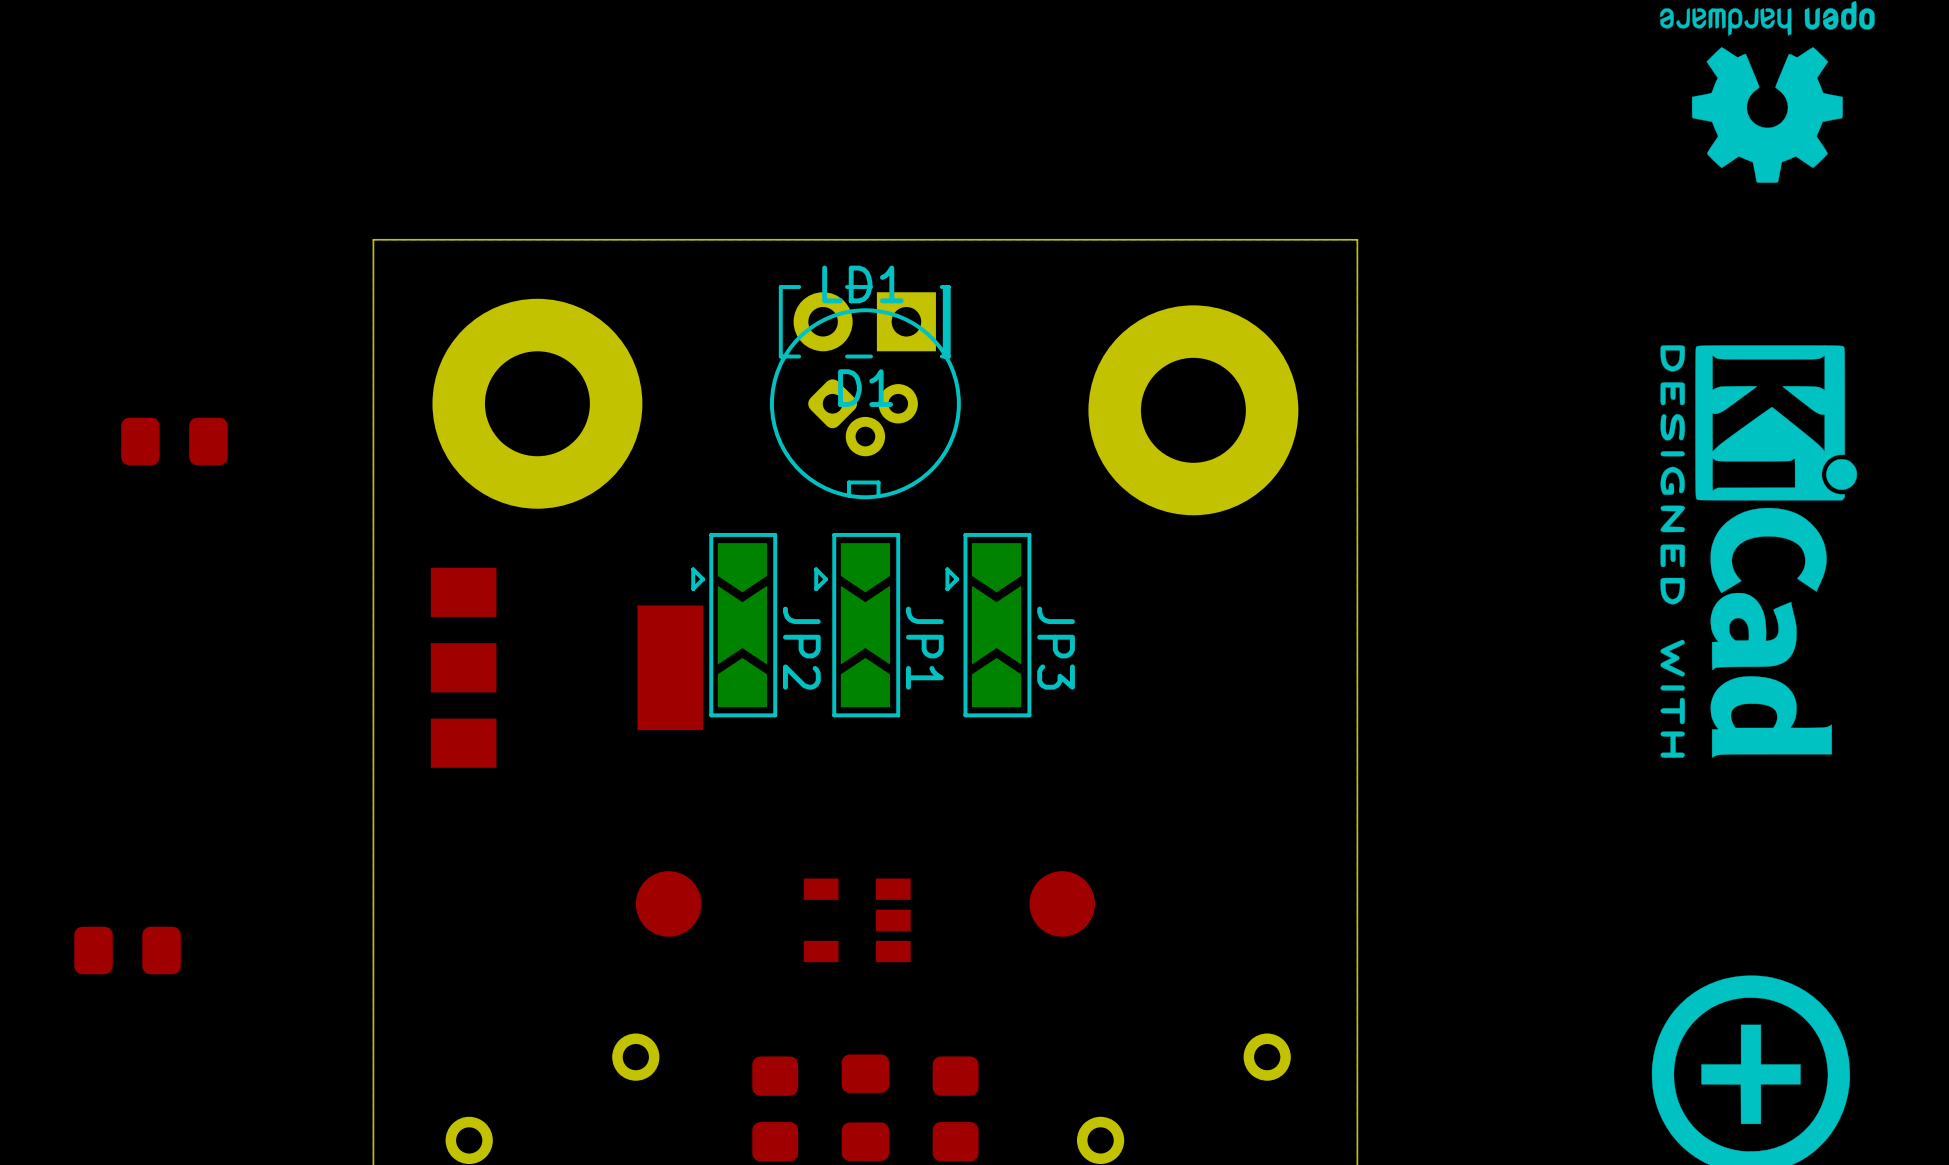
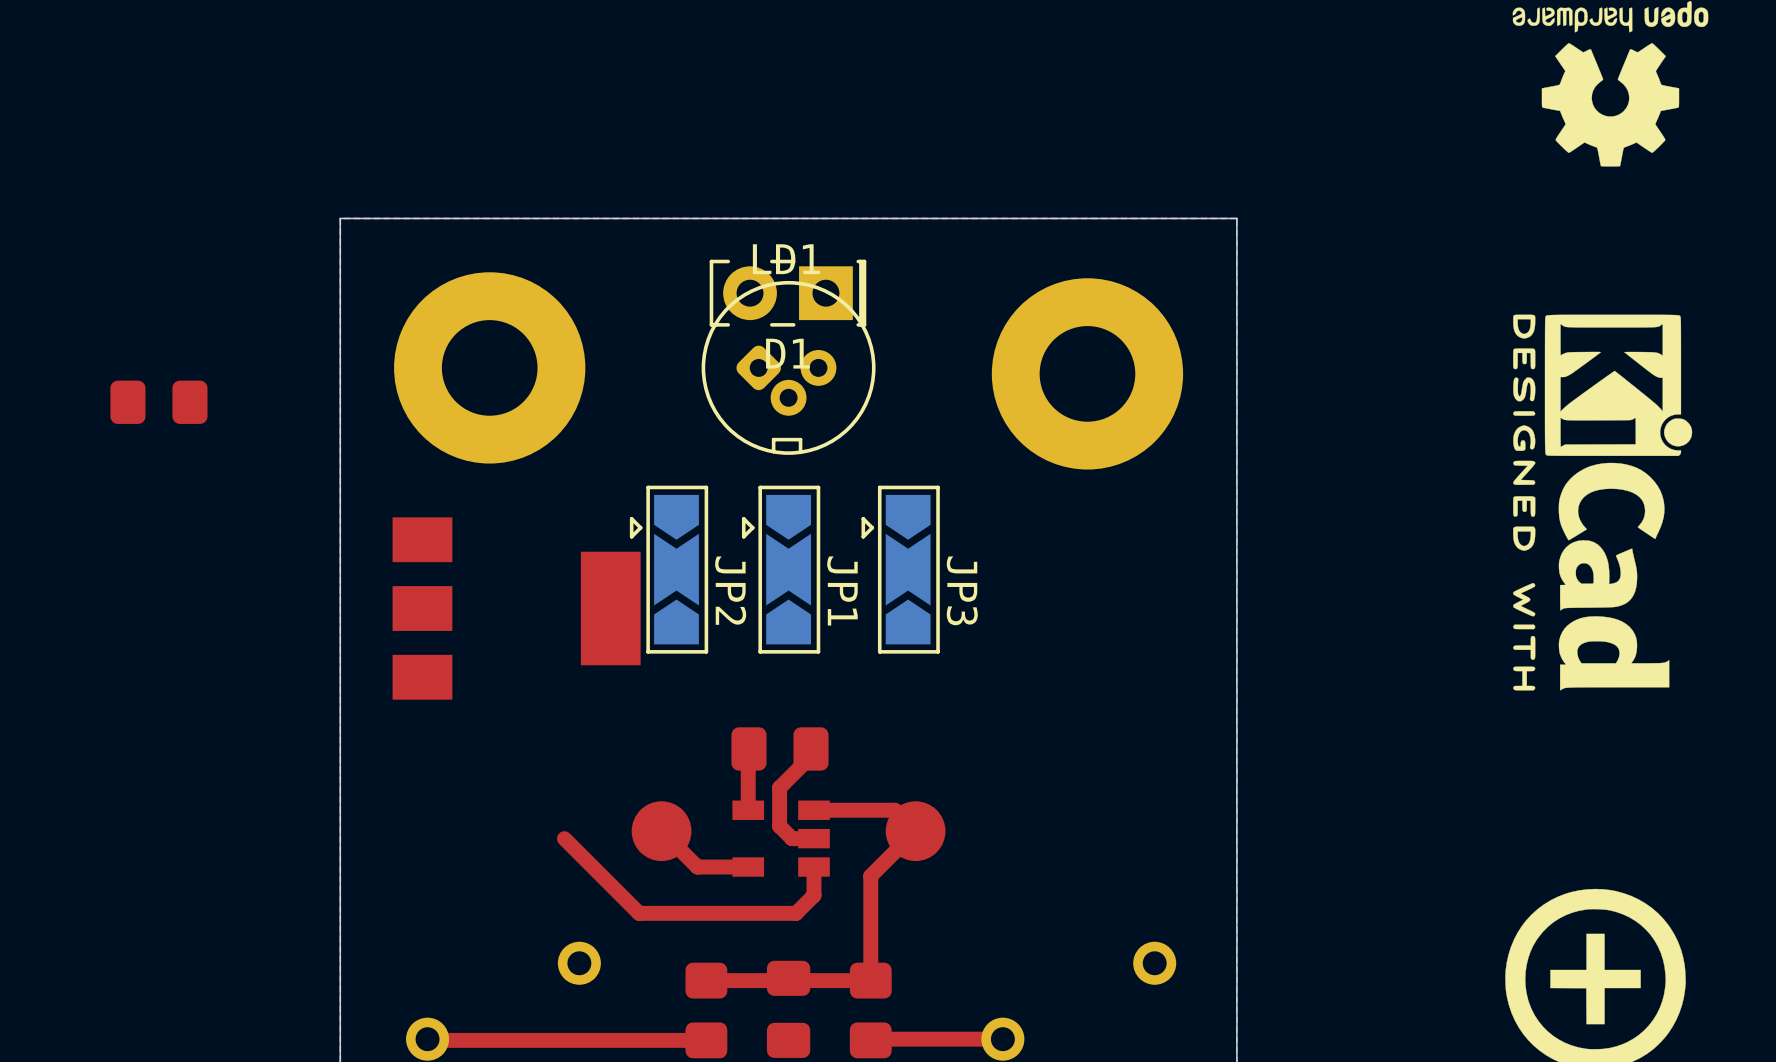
top track: none -> (748, 748) (748, 810)
top track: none -> (811, 748) (811, 756) (779, 787) (779, 826) (792, 838) (813, 838)
top track: none -> (813, 810) (894, 810) (915, 831) (870, 876) (870, 980) (790, 980) (788, 978) (786, 980) (706, 980)
part position: (668, 903) -> (661, 831)
part position: (1062, 903) -> (915, 831)
top track: none -> (661, 831) (697, 867) (748, 867)
top track: none -> (564, 838) (639, 913) (796, 913) (813, 895) (813, 867)
part position: (127, 950) -> (779, 748)
top track: none -> (427, 1039) (706, 1040)
top track: none -> (1002, 1039) (870, 1040)

